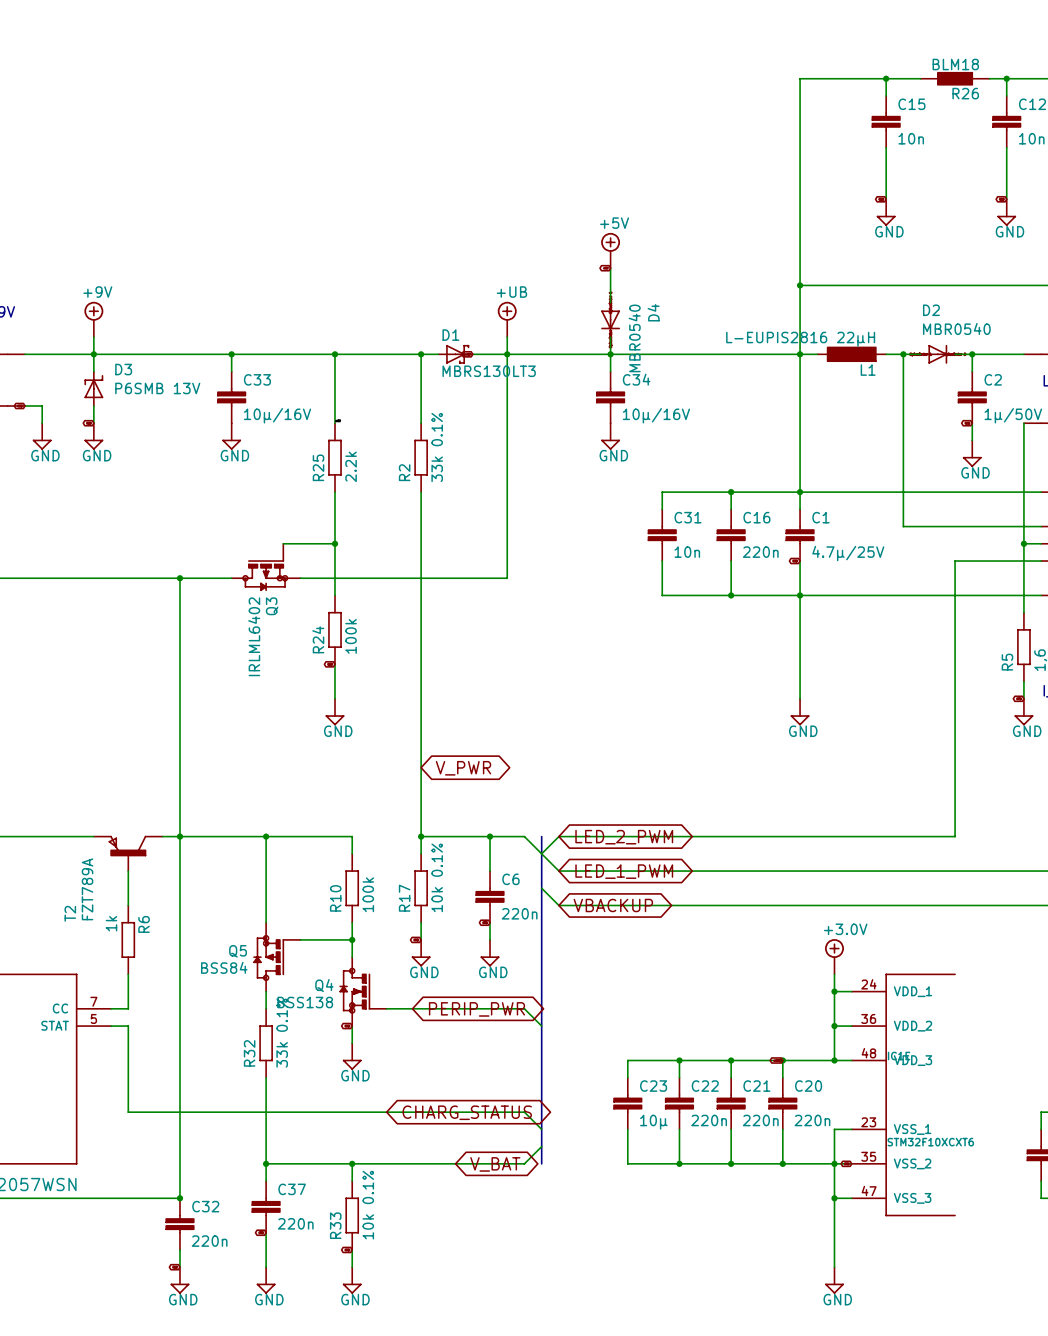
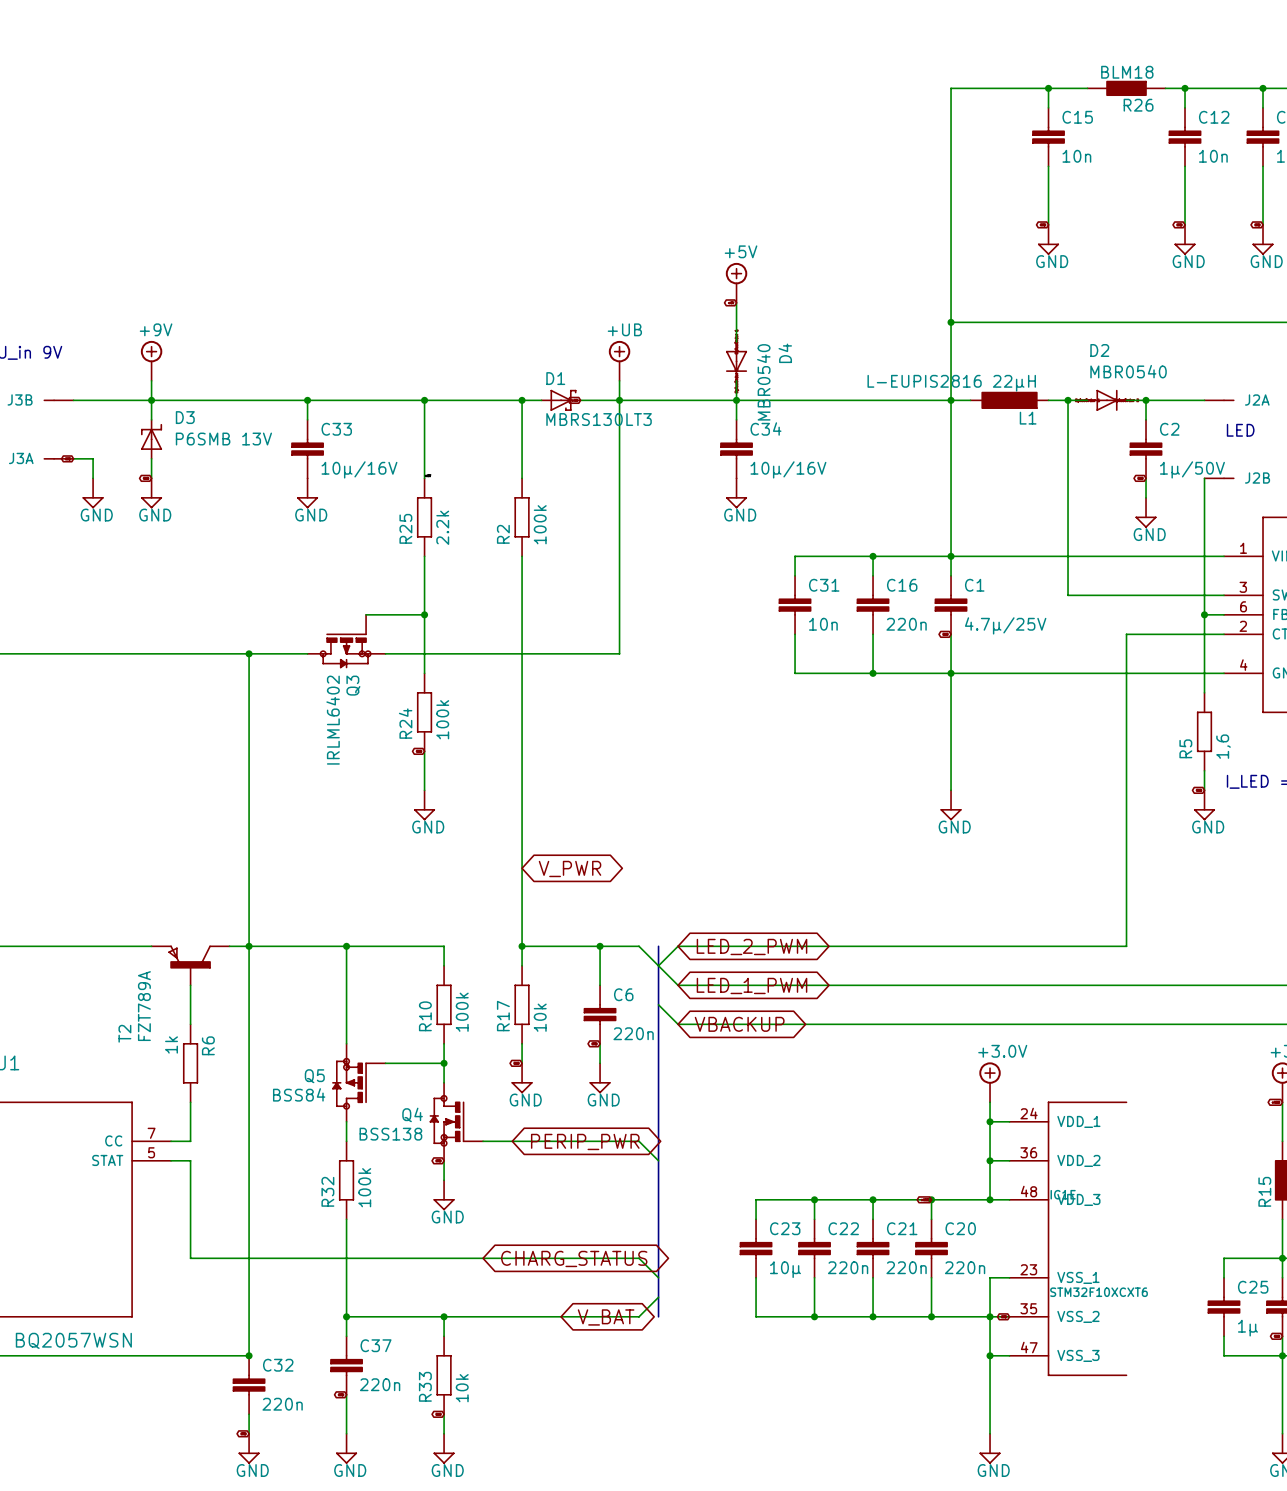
R2 value: 33k 0.1% (437, 447) -> 100k (540, 524)
R17 value: 10k 0.1% (437, 877) -> 10k (540, 1017)
R32 value: 33k 0.1% (282, 1033) -> 100k (364, 1187)
R33 value: 10k 0.1% (368, 1205) -> 10k (462, 1388)

